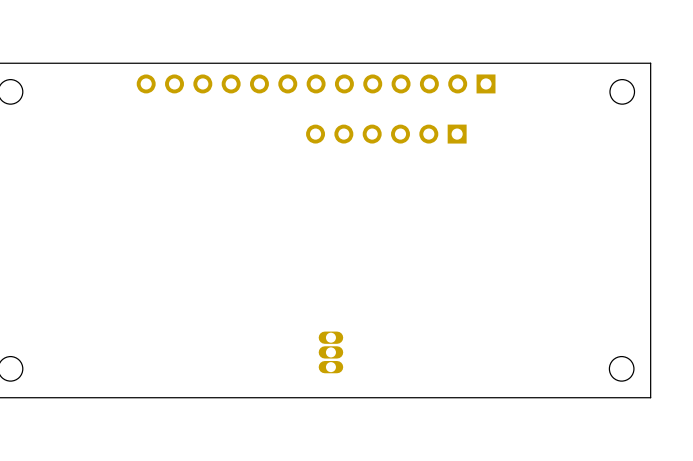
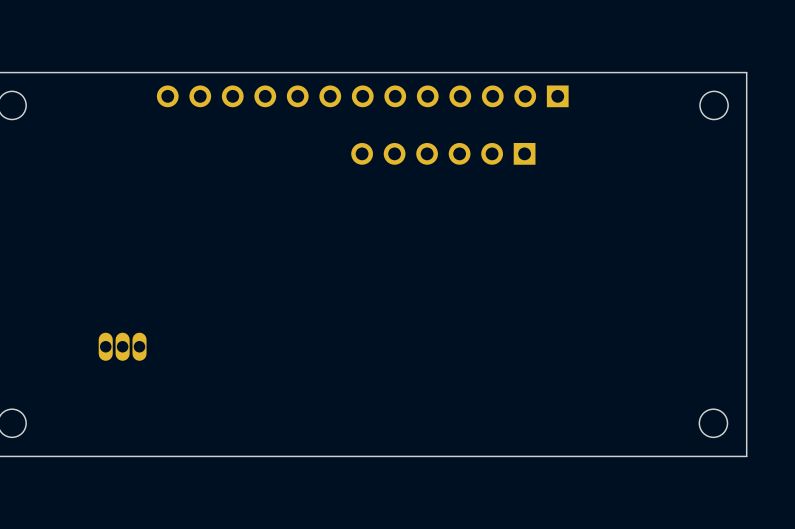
part rotation: 0° (330, 352) -> 90° clockwise (122, 346)
part position: (330, 352) -> (122, 346)

